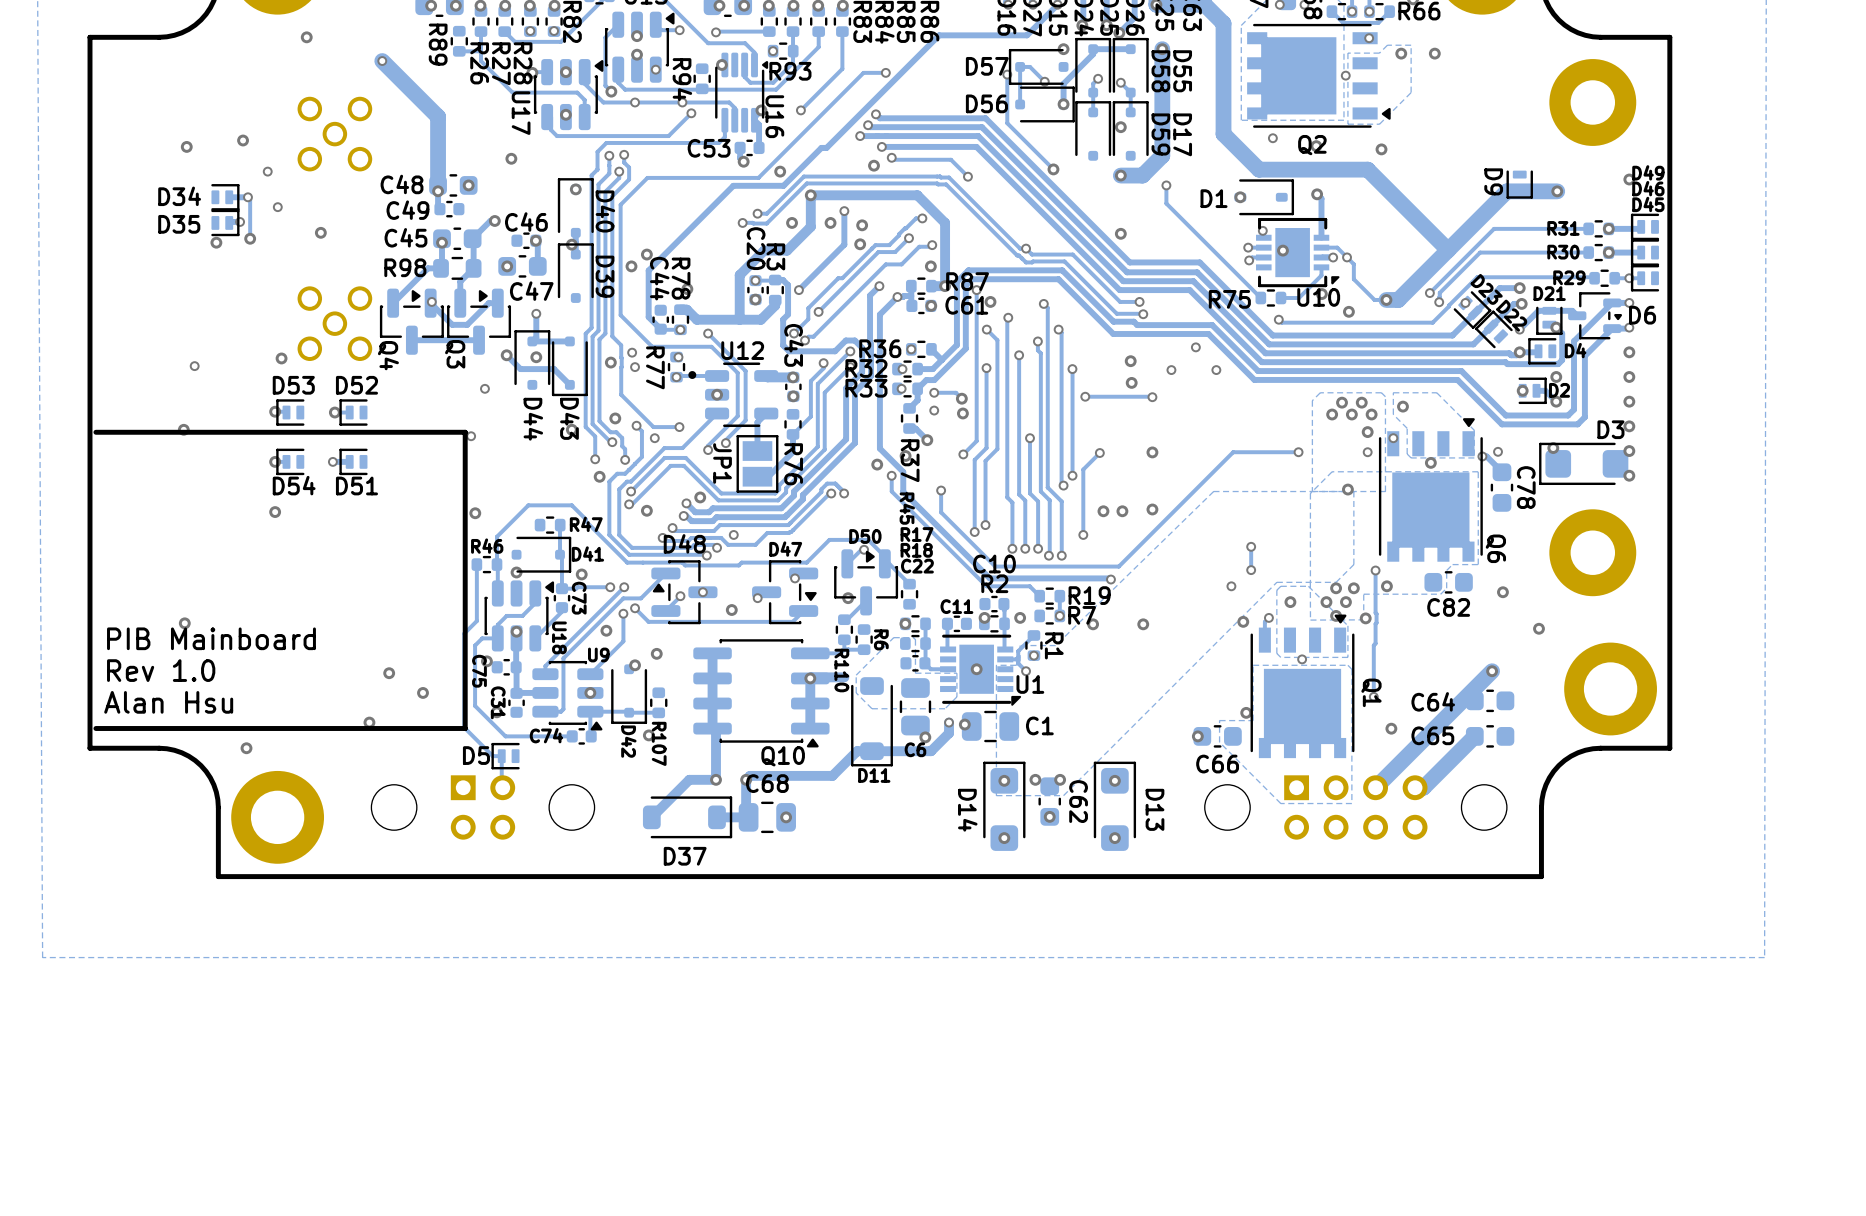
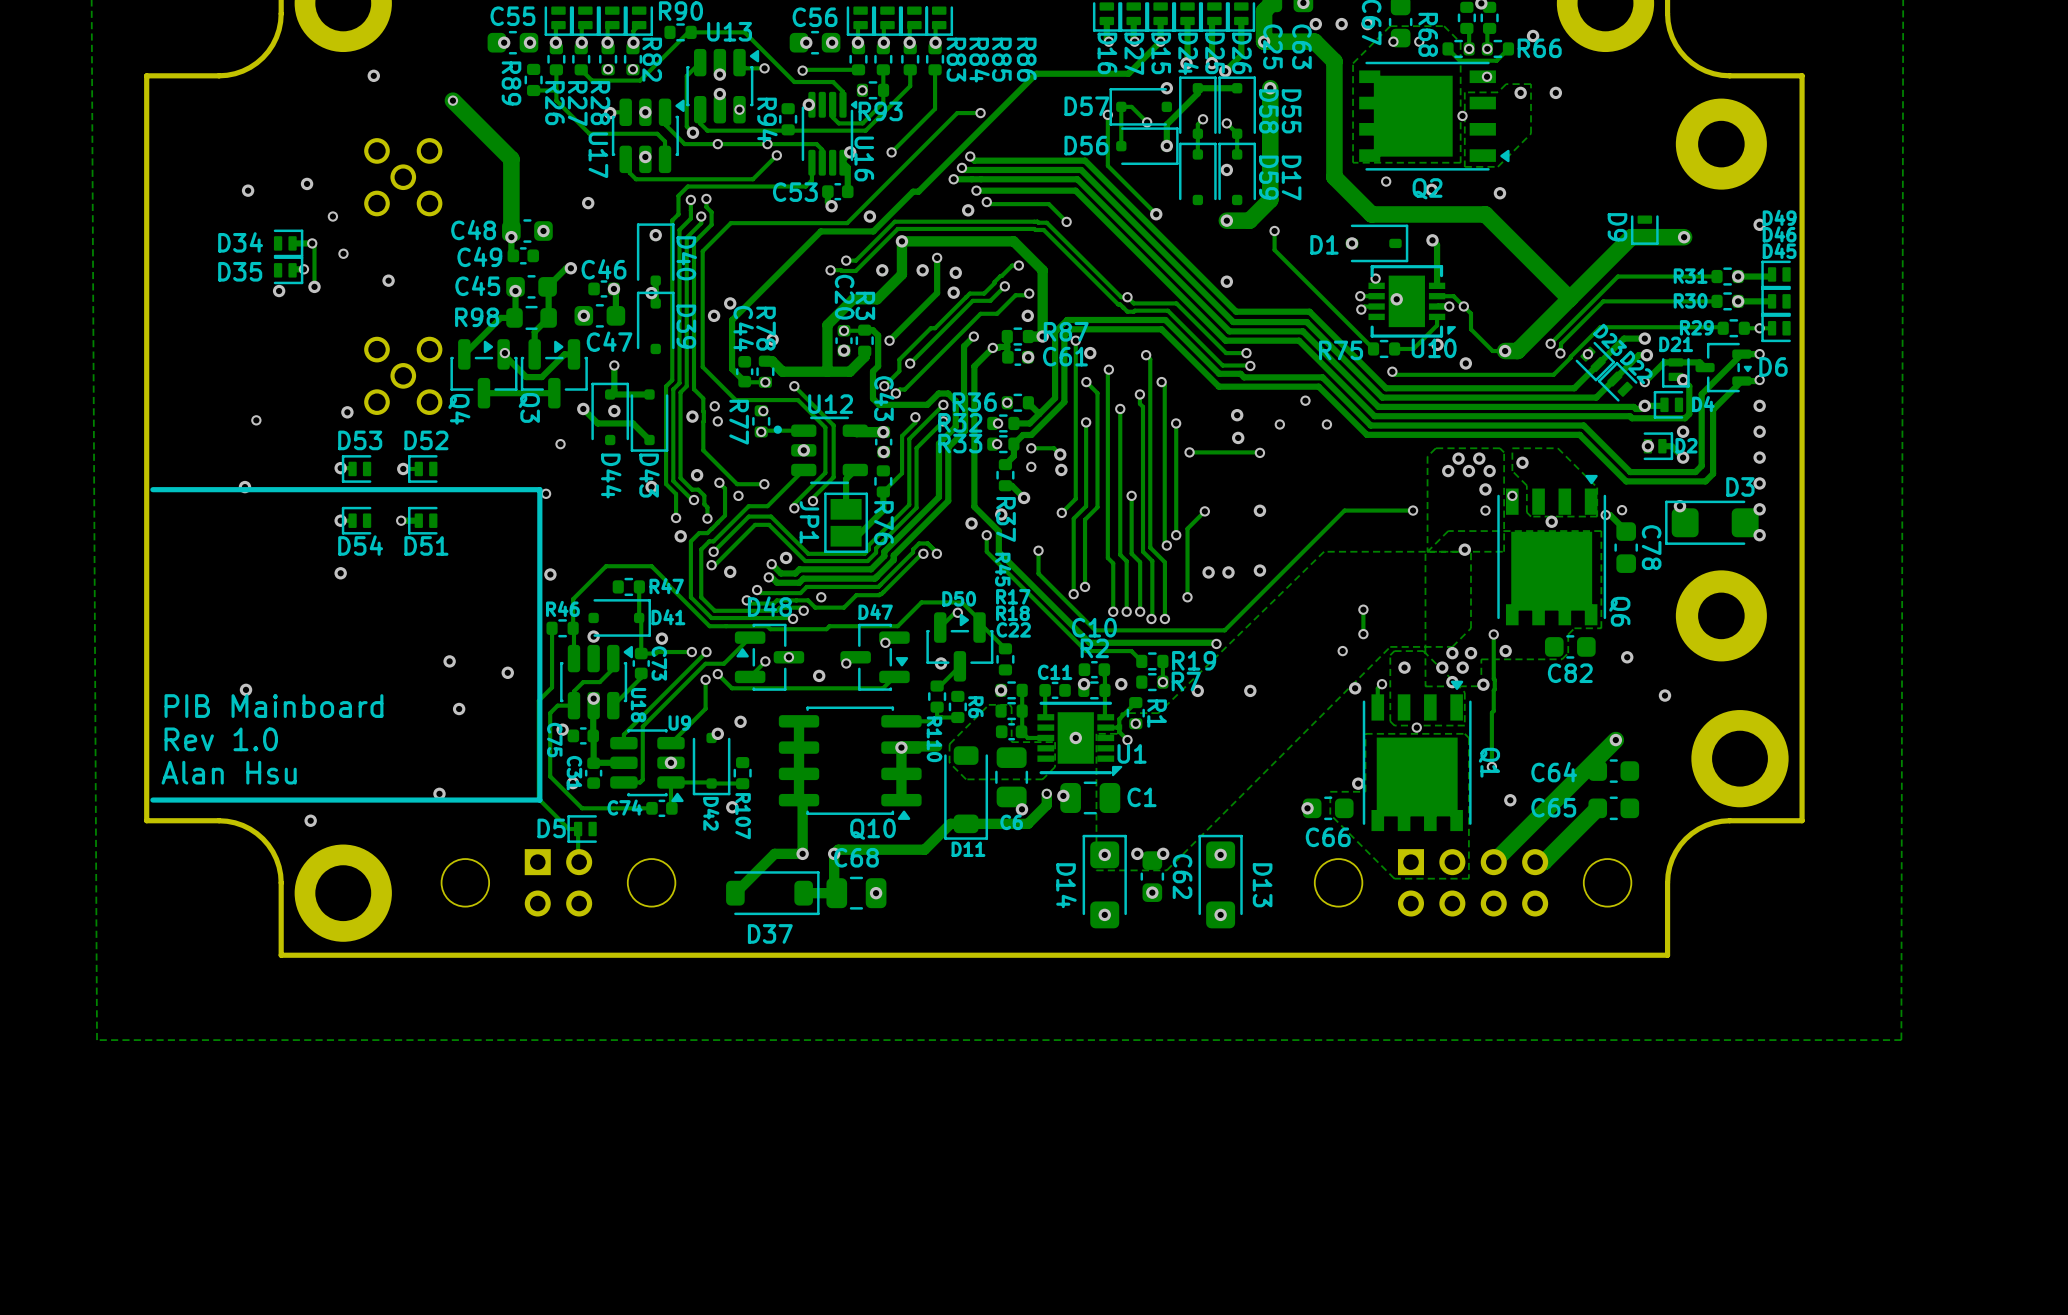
via: none -> (449, 661)
via: none -> (507, 672)
via: (606, 630) -> none
via: none -> (459, 709)
via: (389, 673) -> none
via: (423, 692) -> none

